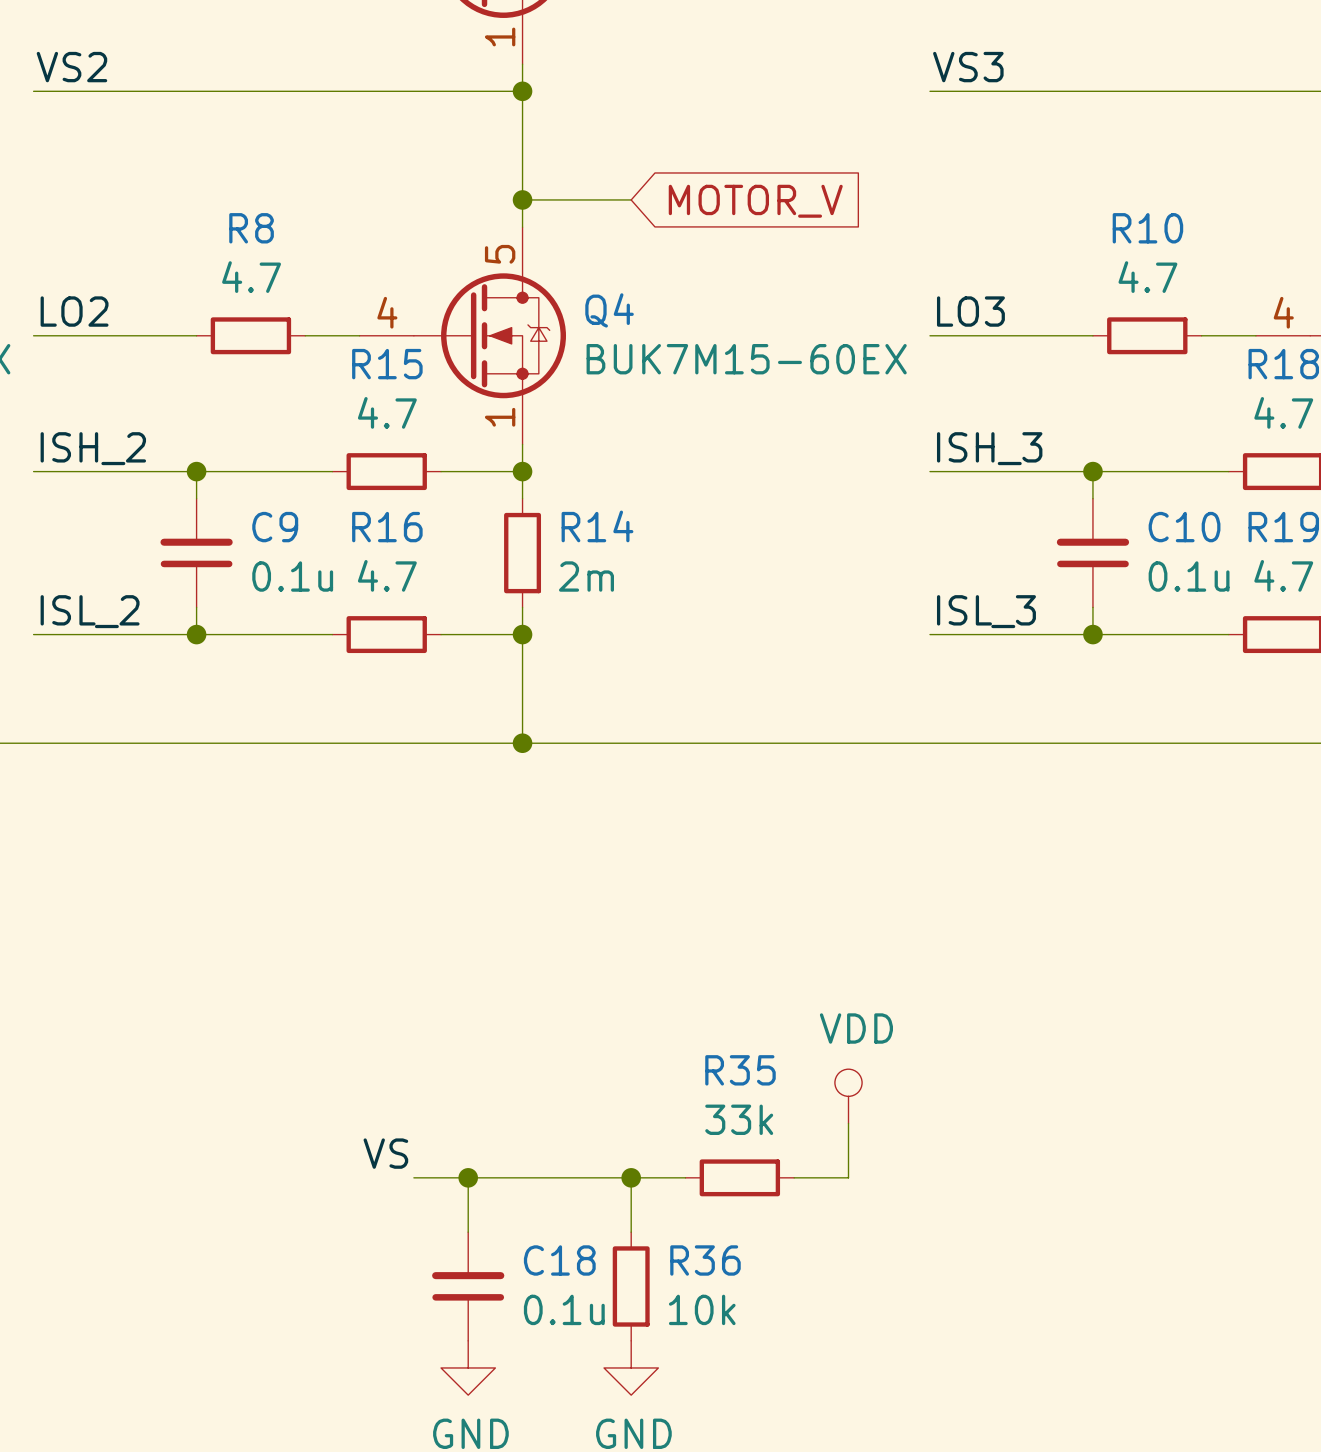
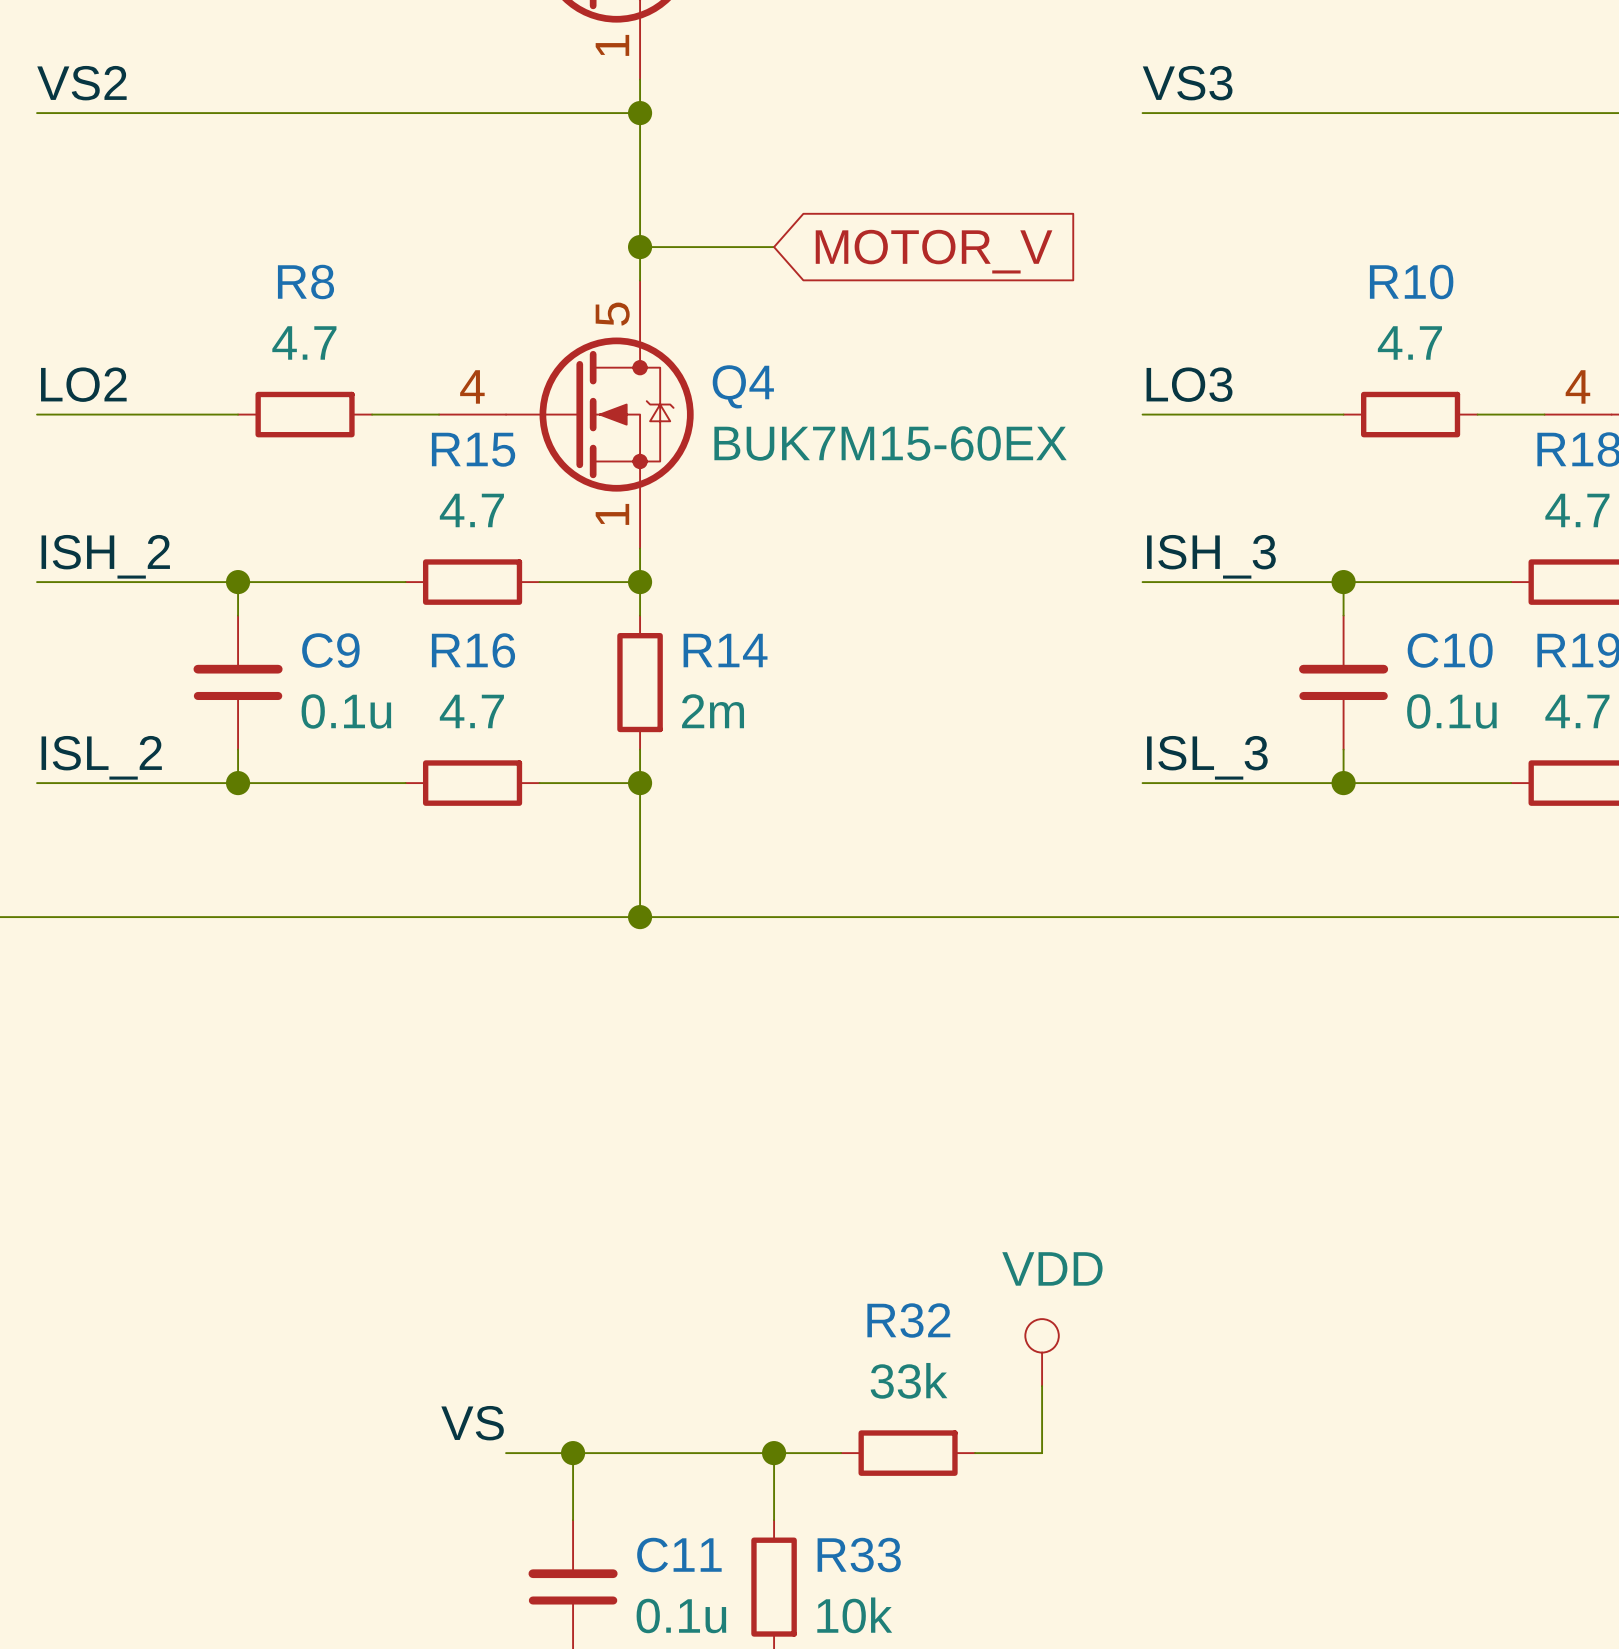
R35 name: R35 (740, 1070) -> R32 (908, 1320)
C18 name: C18 (559, 1260) -> C11 (679, 1555)
R36 name: R36 (705, 1260) -> R33 (859, 1555)

